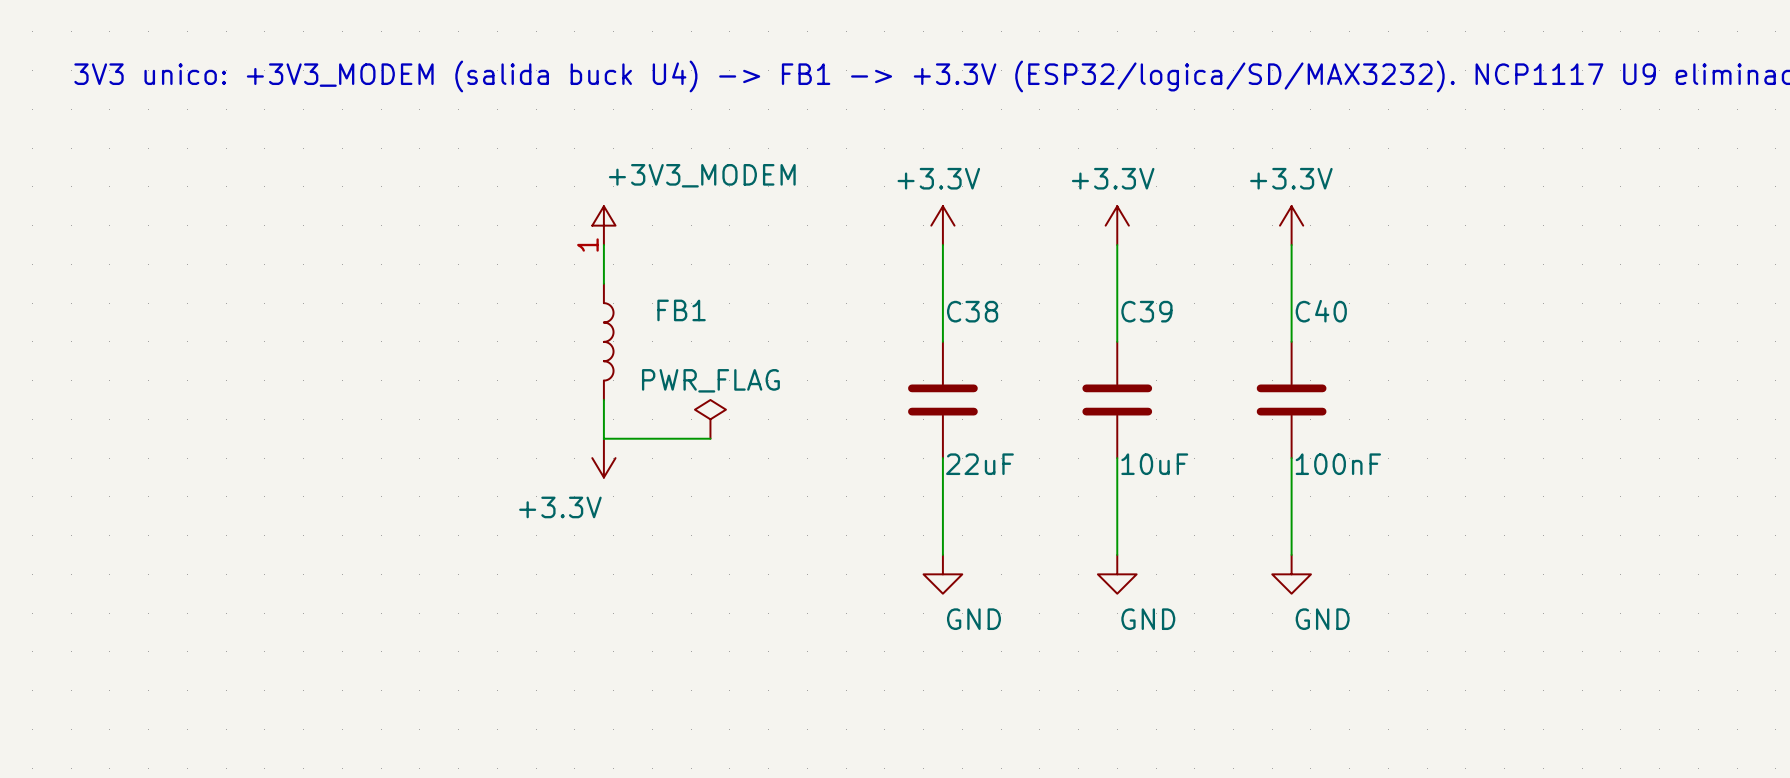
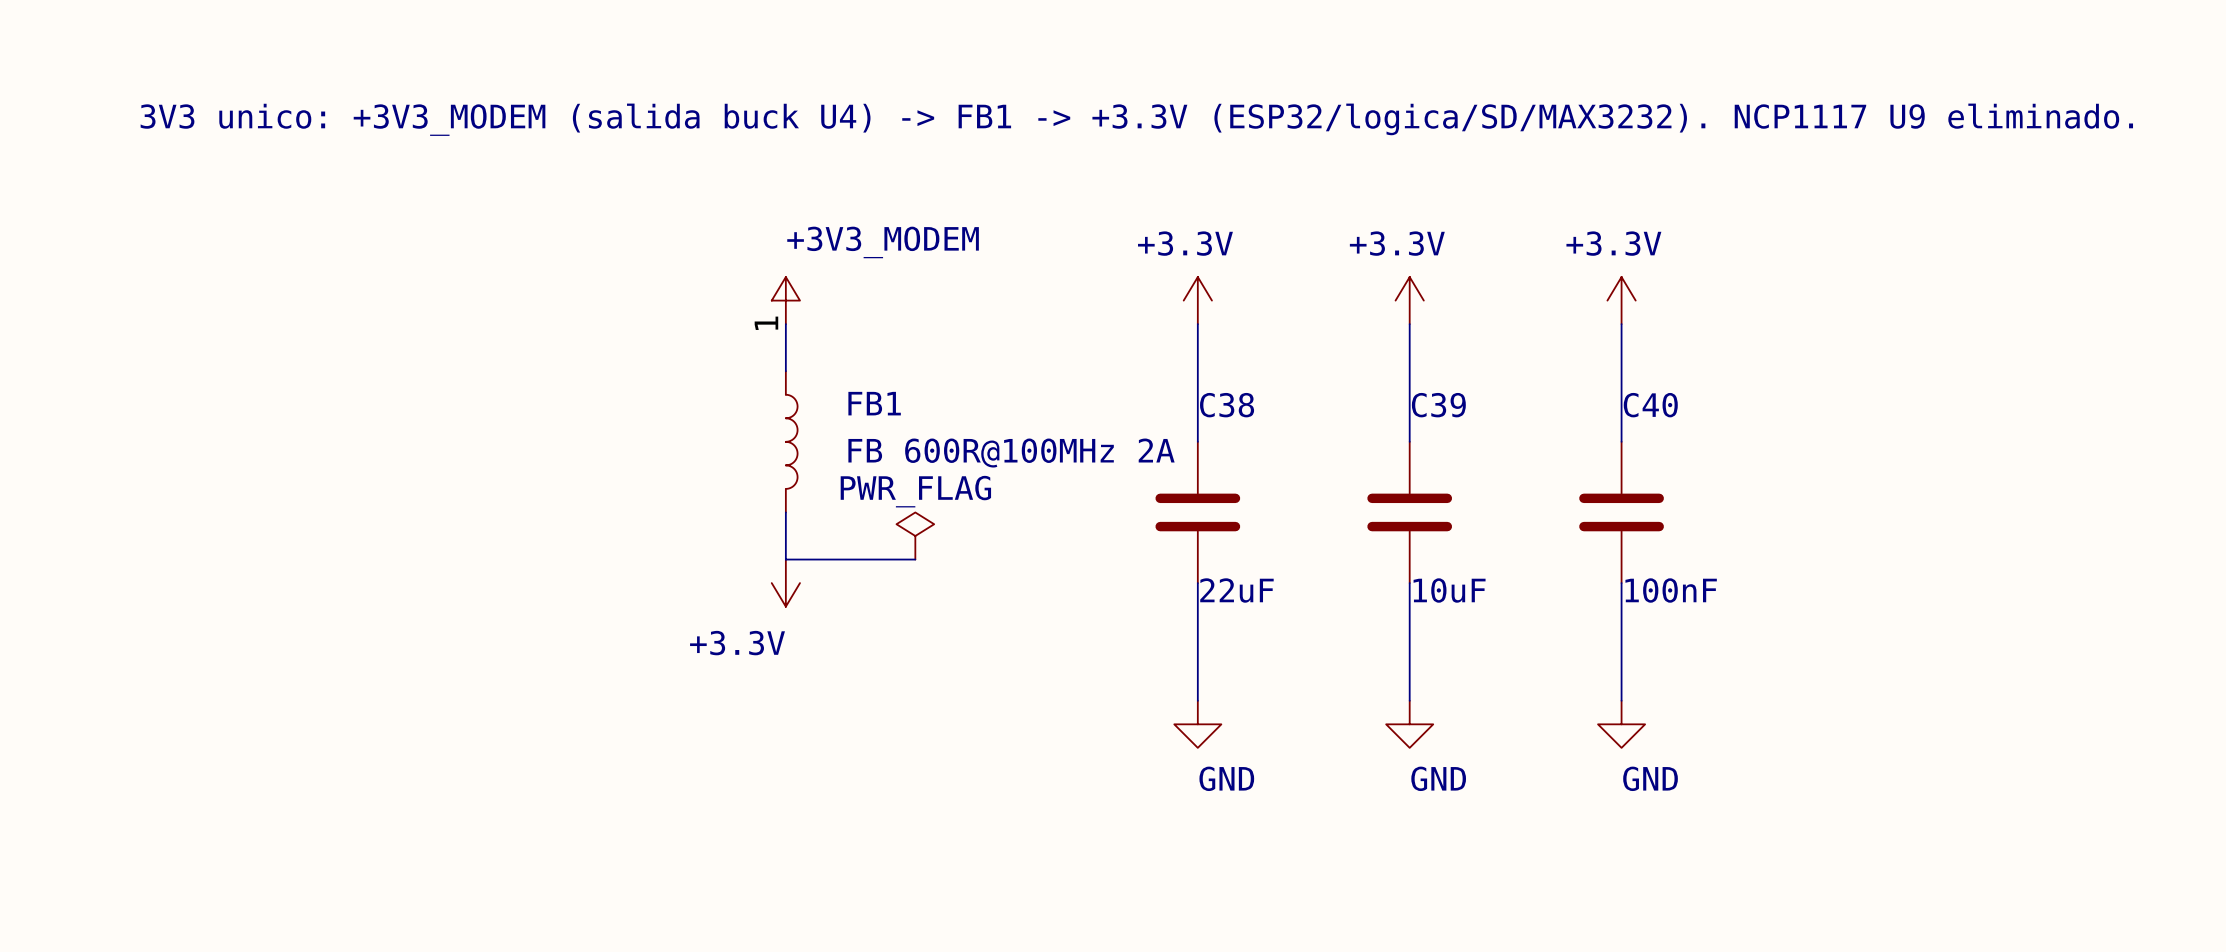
FB1 value: none -> FB 600R@100MHz 2A (1011, 453)

